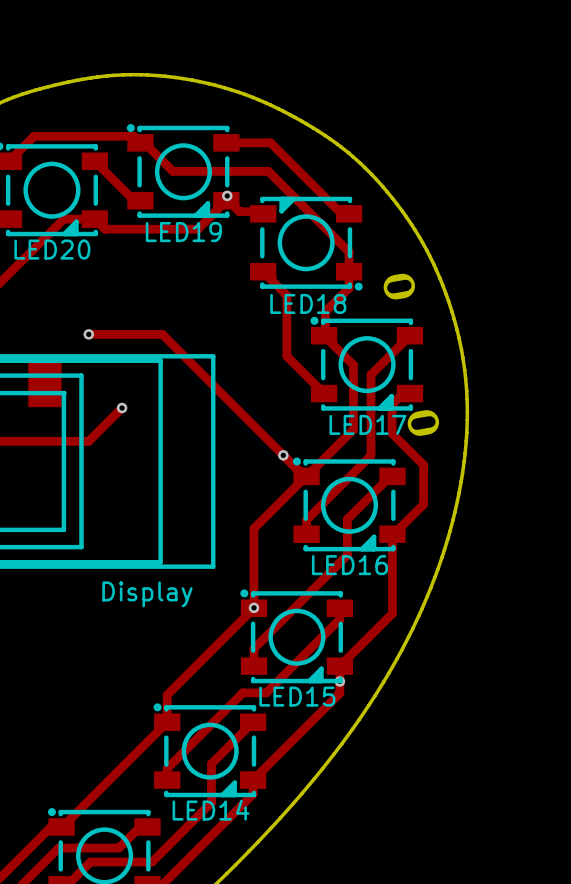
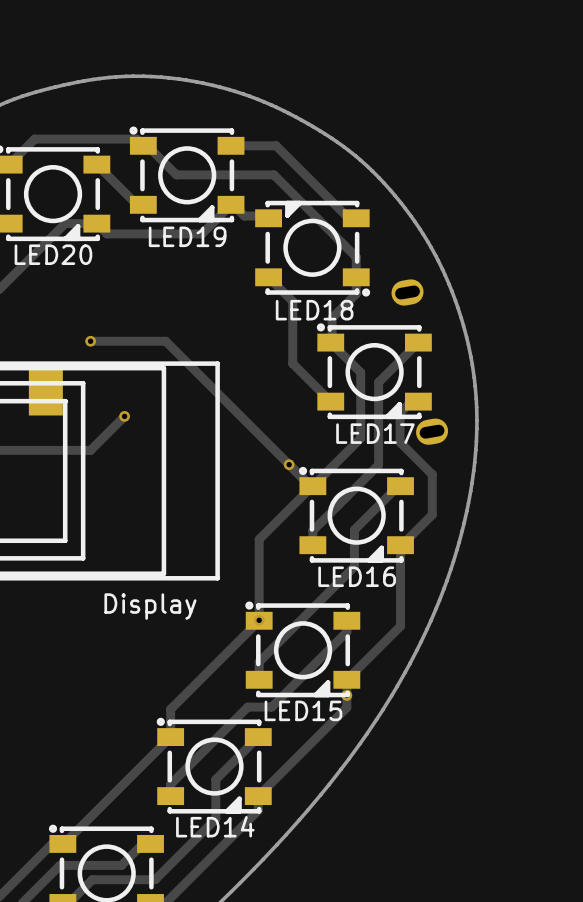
via: (227, 195) -> none

